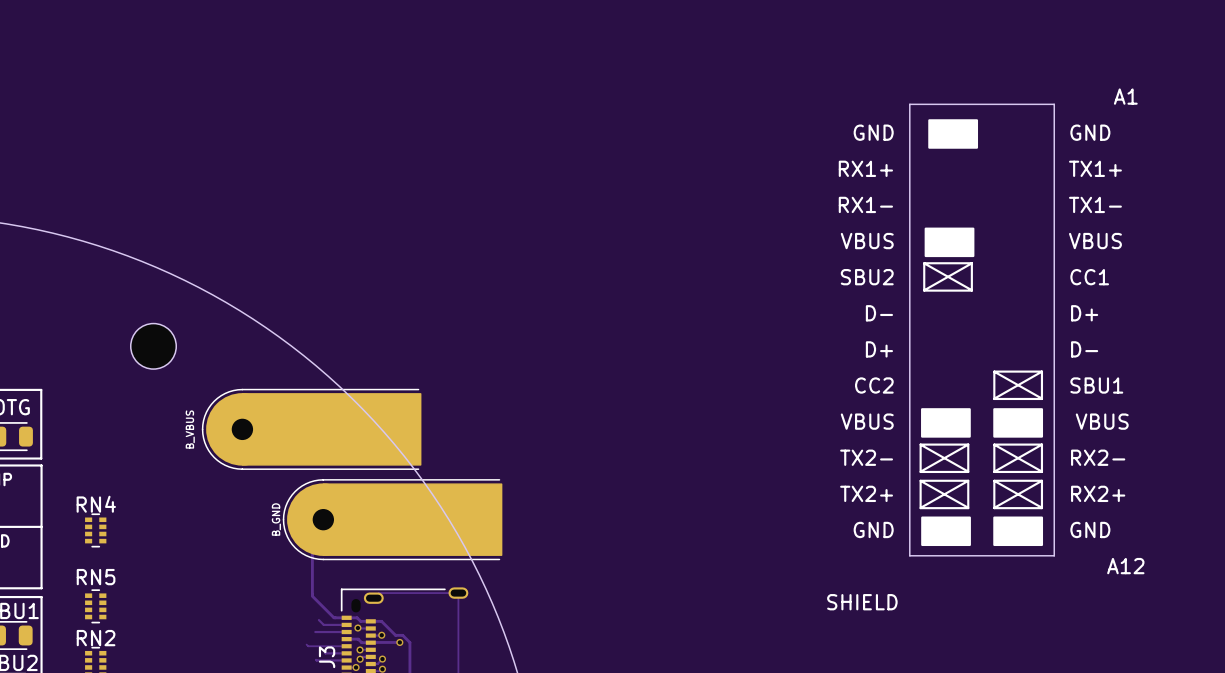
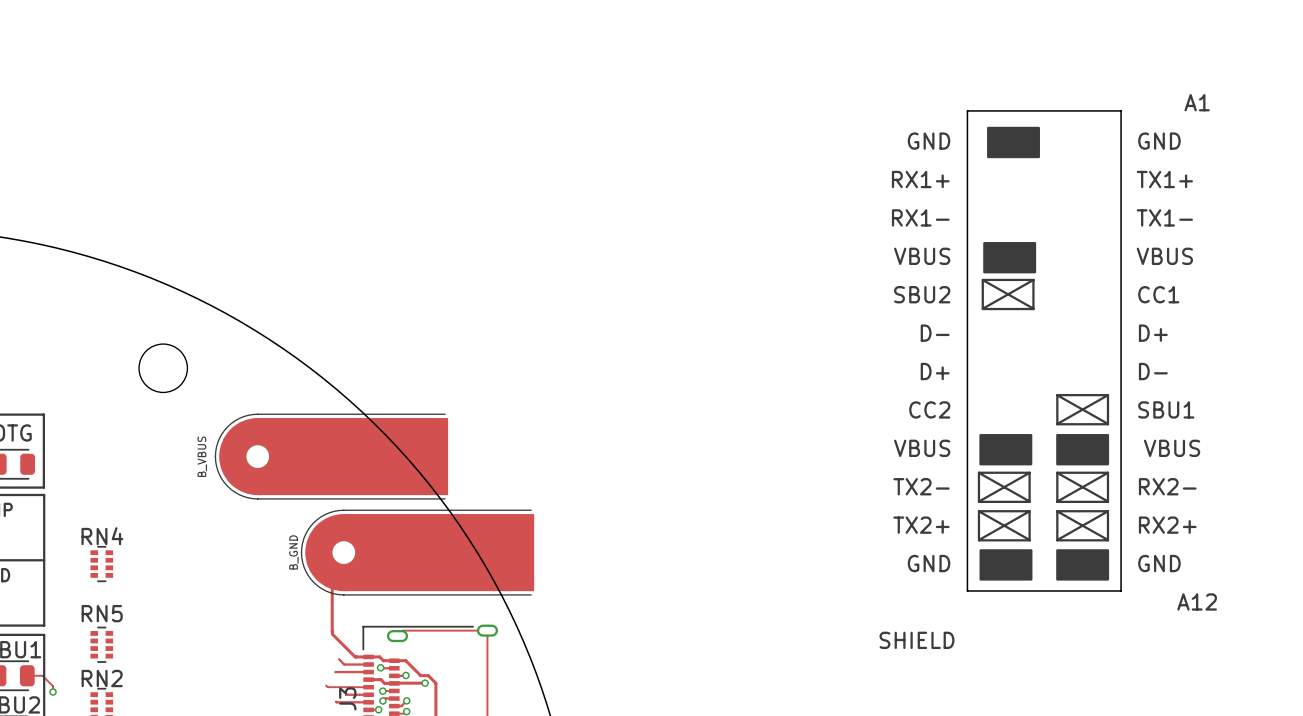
track: none -> (27, 675) (42, 675) (53, 686) (53, 692)
via: none -> (53, 692)

